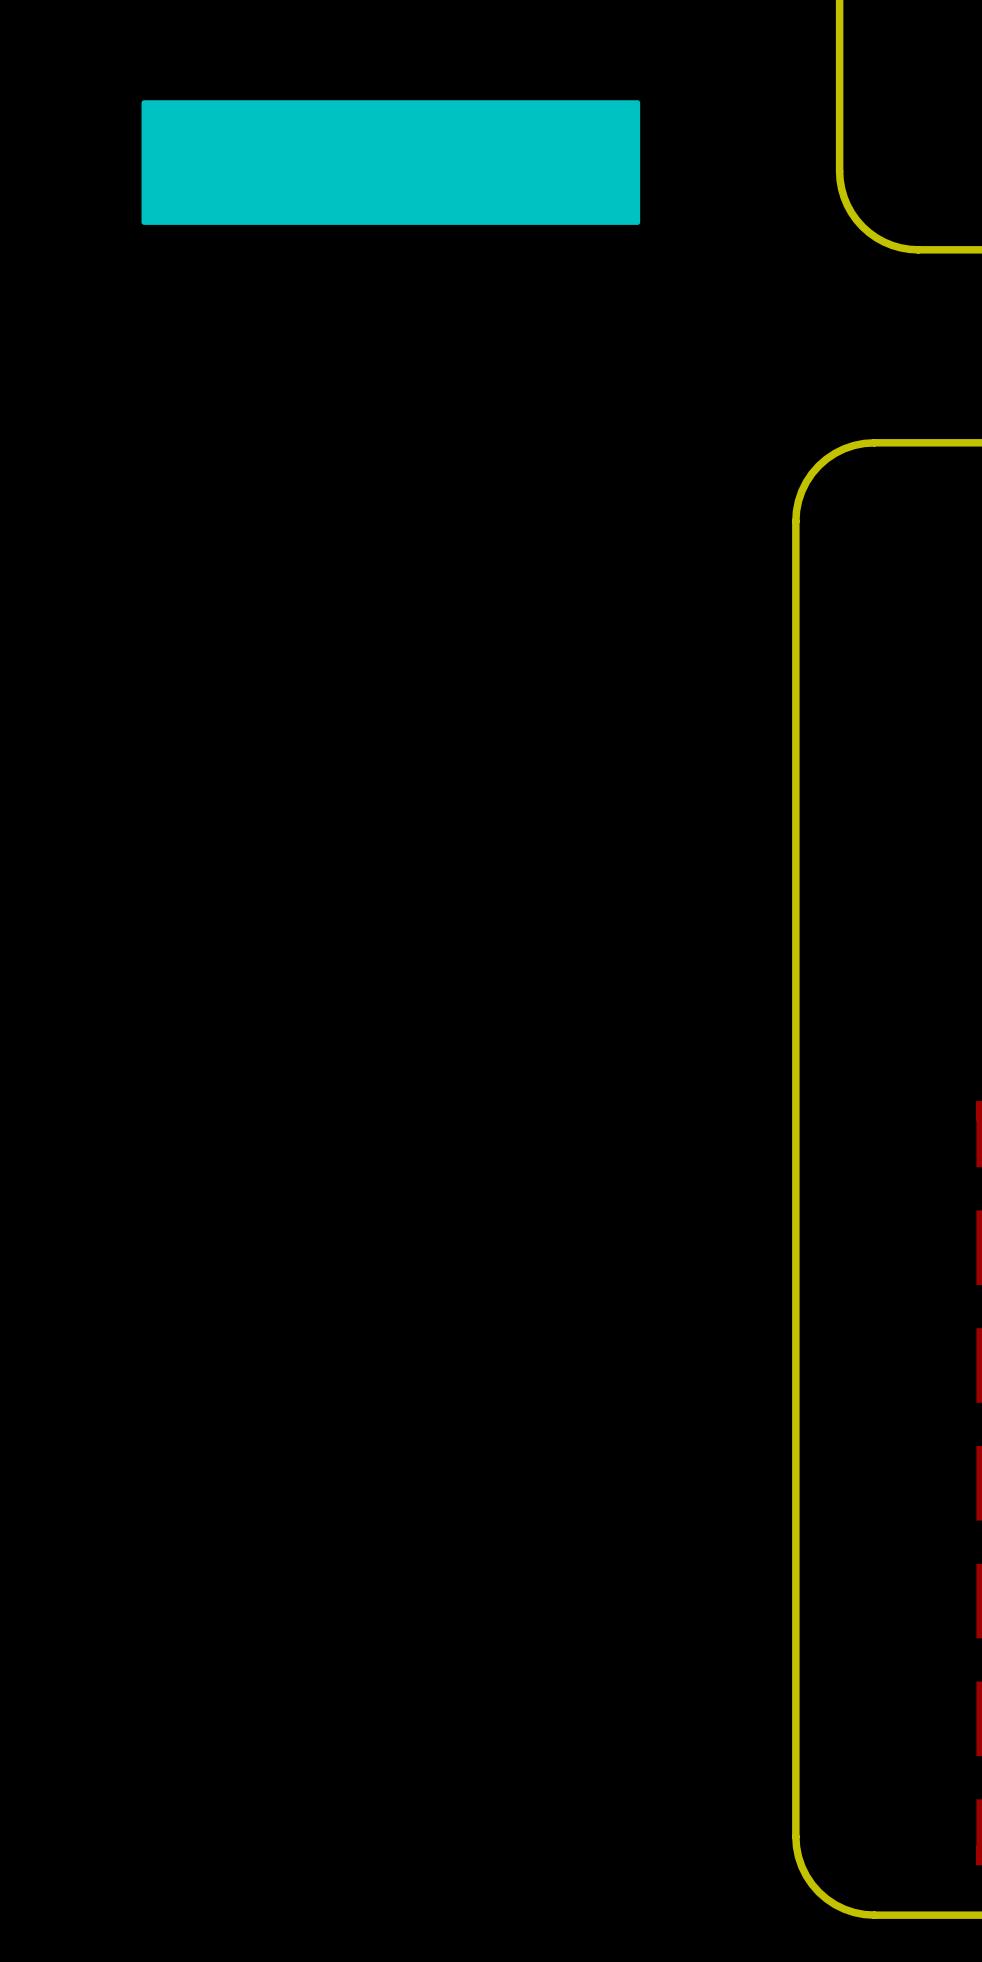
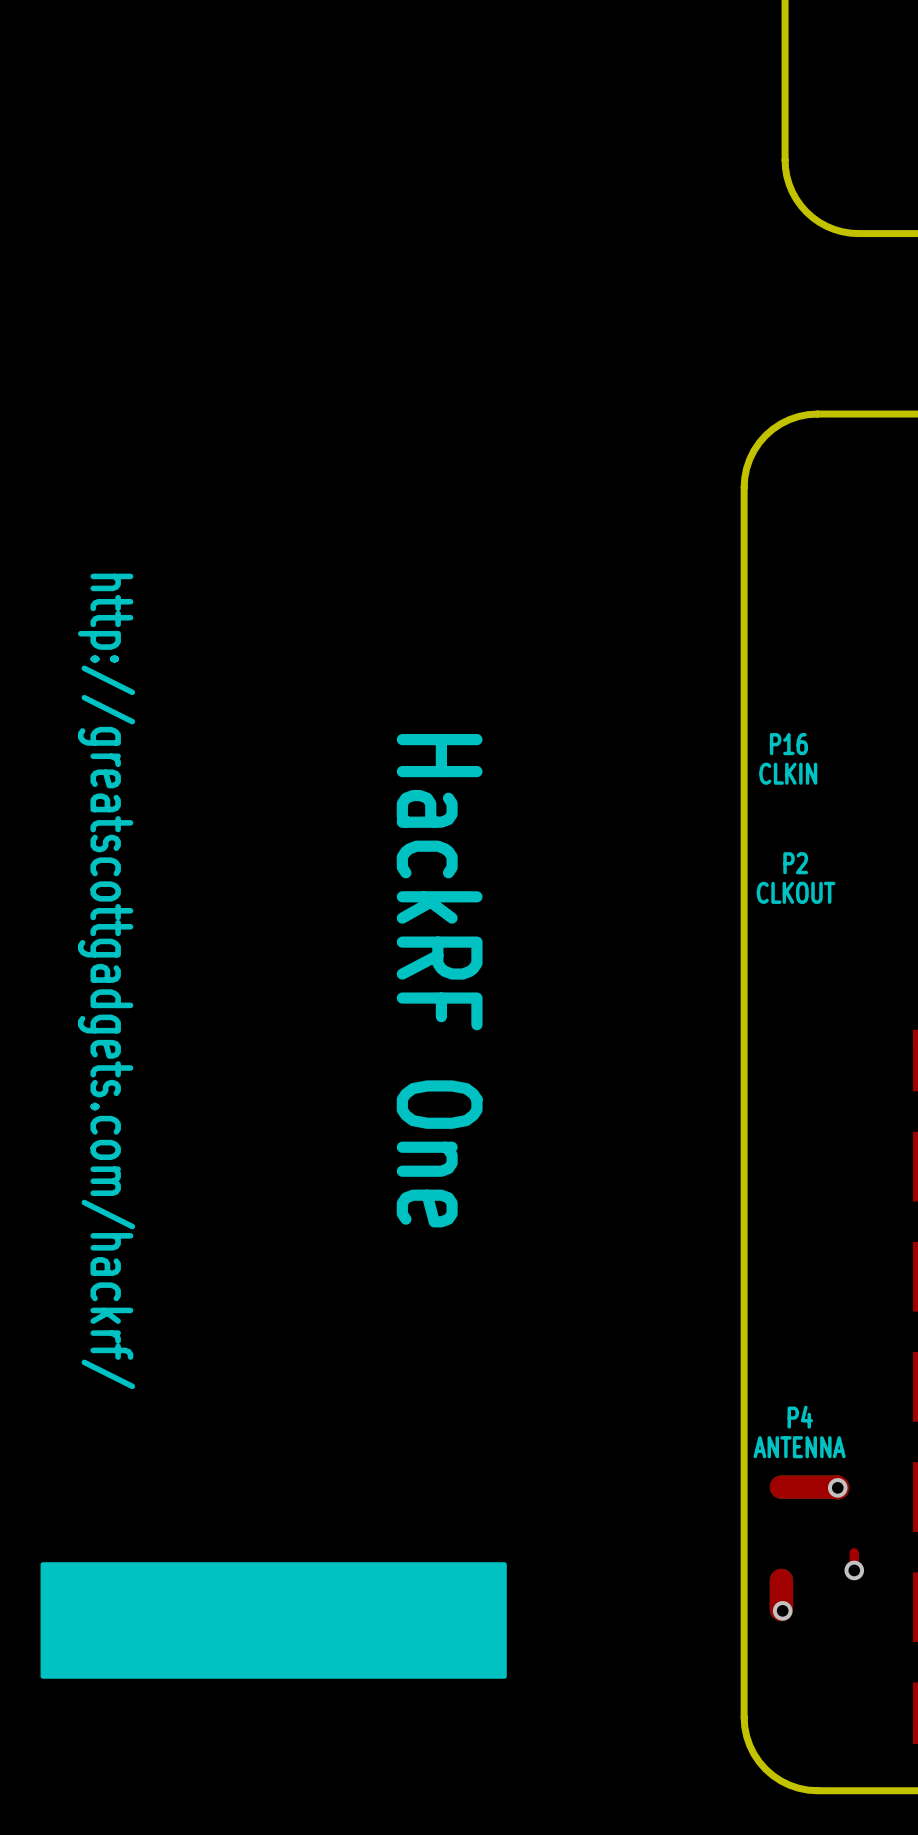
drawing: [141, 100, 641, 225] -> none
text: none -> P16 (788, 744)
text: none -> CLKIN (788, 773)
text: none -> P2 (795, 863)
text: none -> CLKOUT (796, 892)
text: none -> HackRF One (439, 980)
text: none -> http://greatscottgadgets.com/hackrf/ (106, 981)
text: none -> P4 (800, 1417)
text: none -> ANTENNA (799, 1447)
top track: none -> (781, 1487) (837, 1487)
via: none -> (837, 1487)
top track: none -> (854, 1552) (854, 1570)
drawing: none -> [40, 1562, 507, 1679]
via: none -> (854, 1570)
top track: none -> (781, 1580) (782, 1610)
via: none -> (782, 1610)

